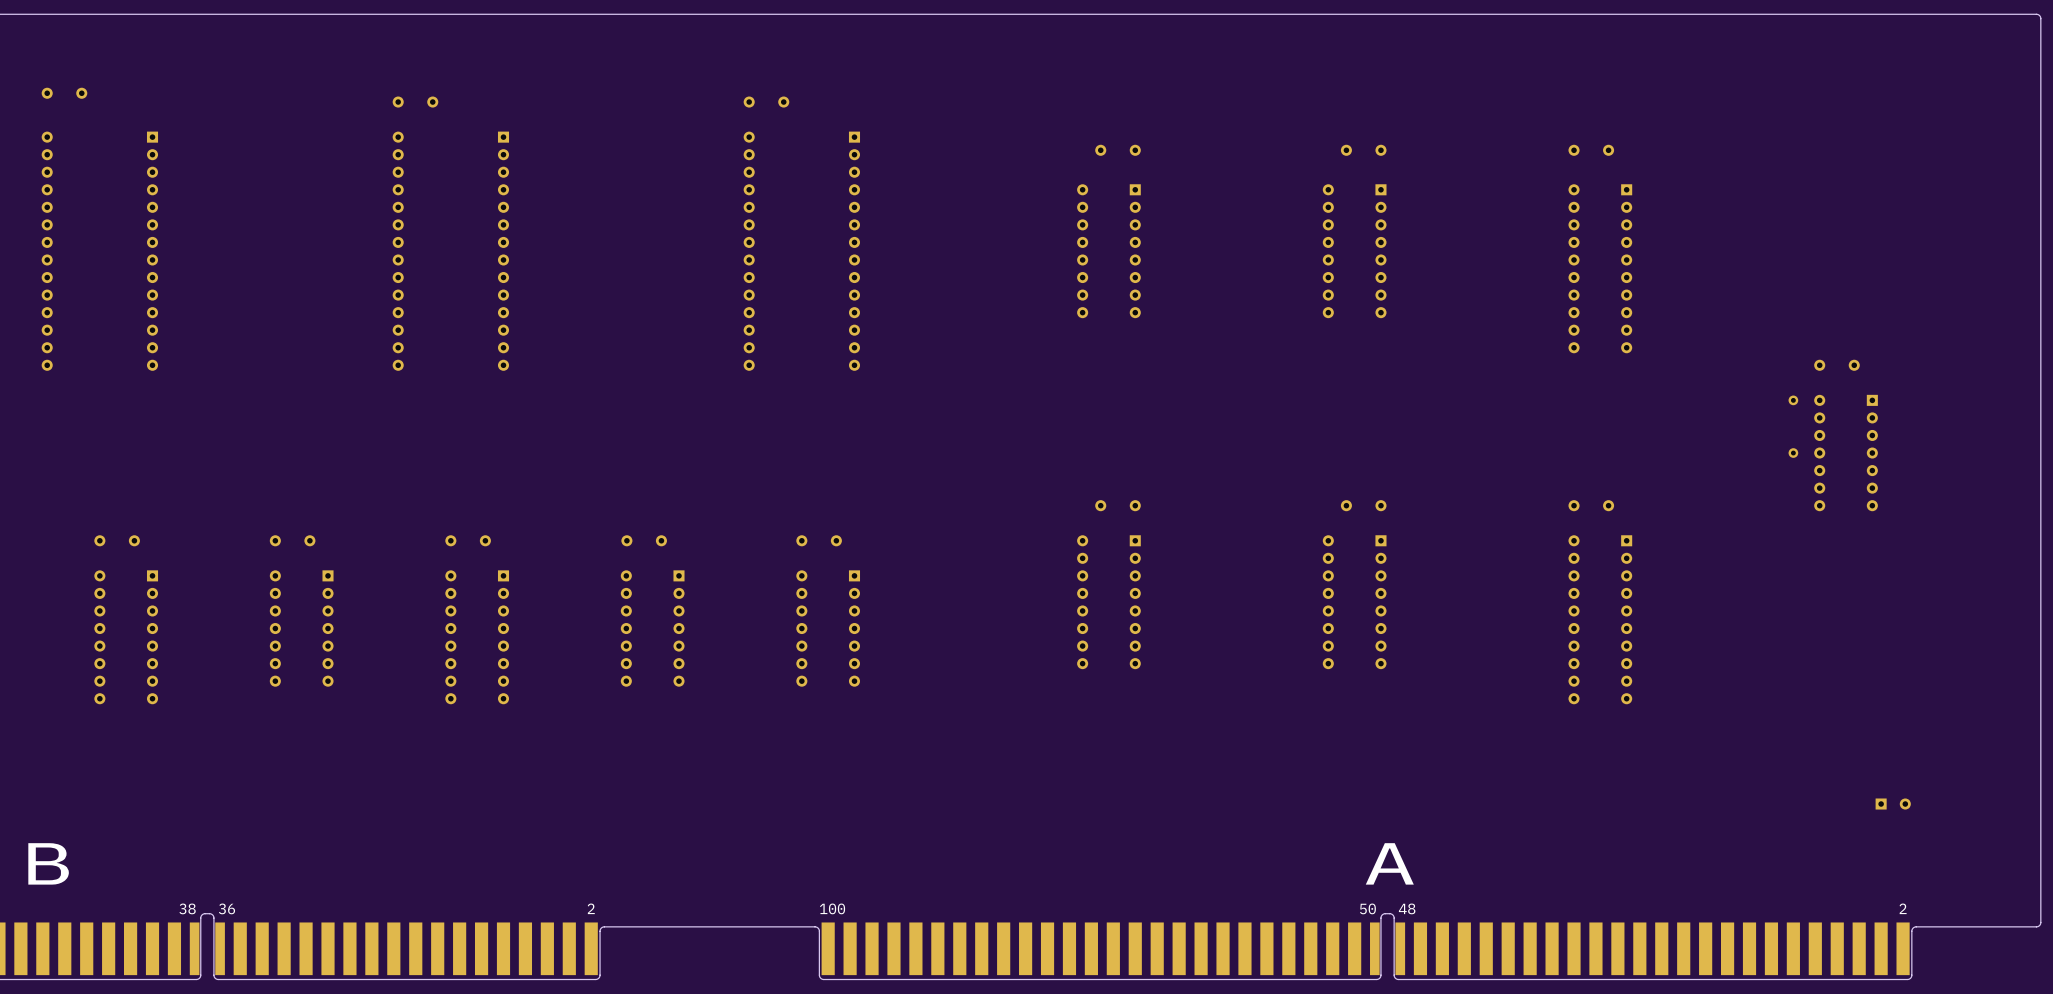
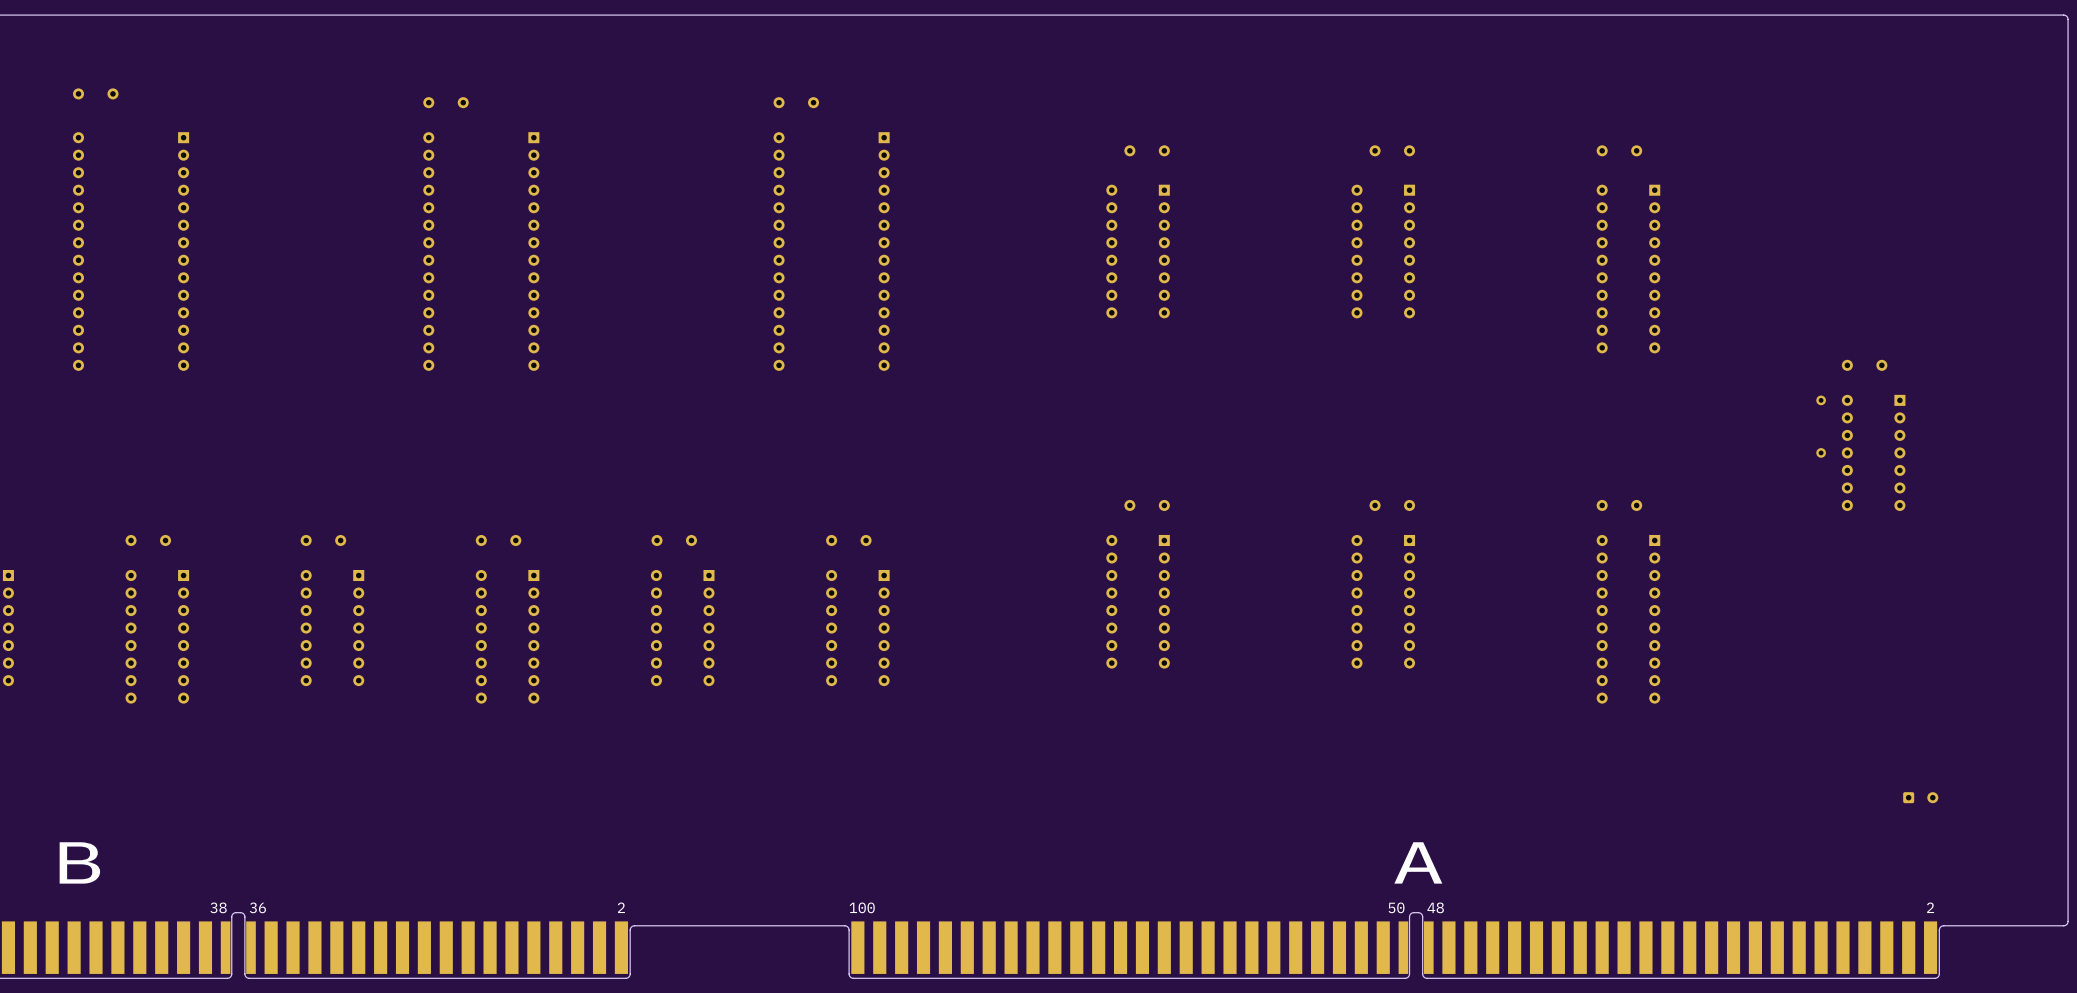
part footprint: [1875, 798, 1911, 810] -> [1903, 792, 1939, 804]

